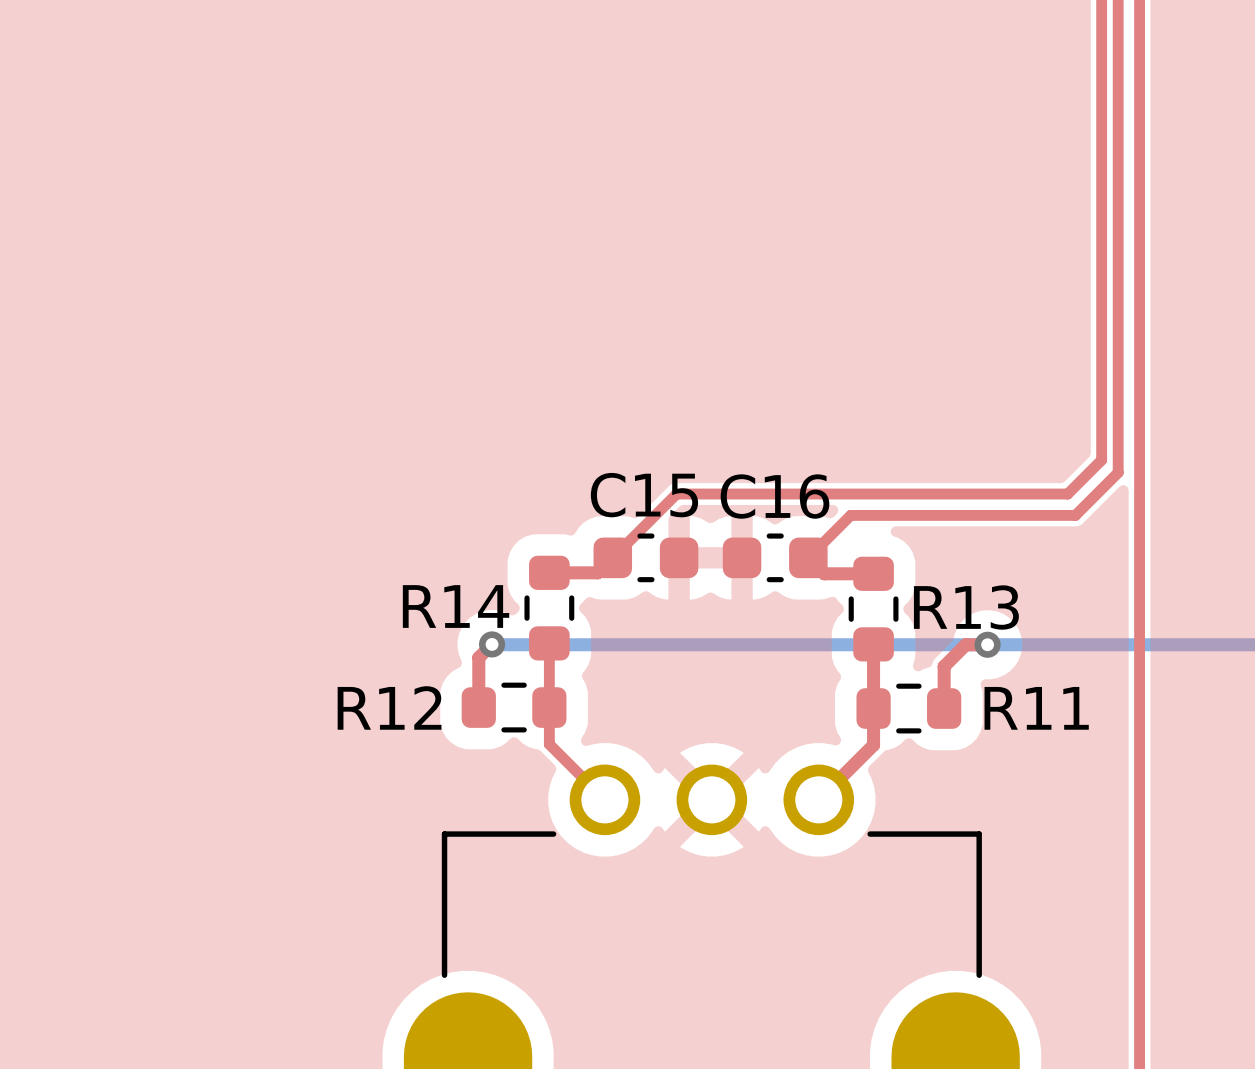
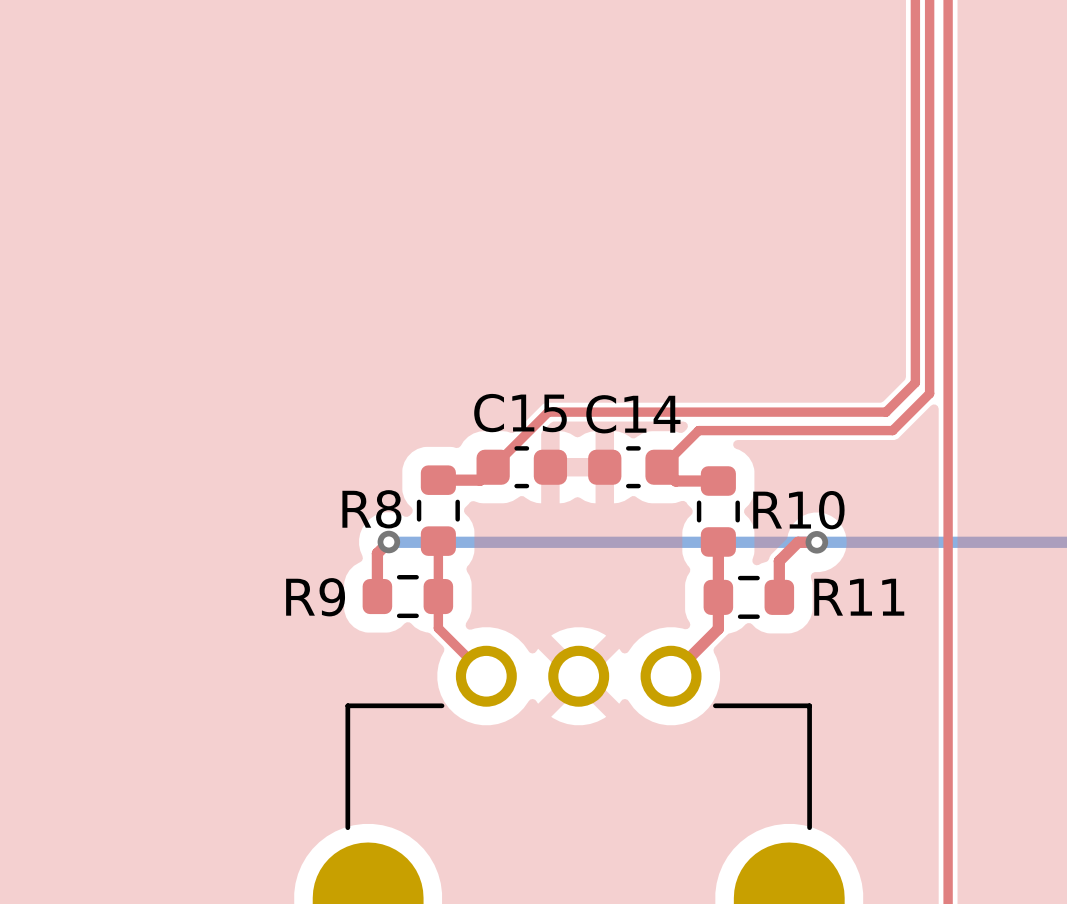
C16 name: C16 (775, 496) -> C14 (633, 414)
R14 name: R14 (456, 606) -> R8 (371, 509)
R13 name: R13 (966, 607) -> R10 (798, 510)
R12 name: R12 (389, 707) -> R9 (315, 597)

